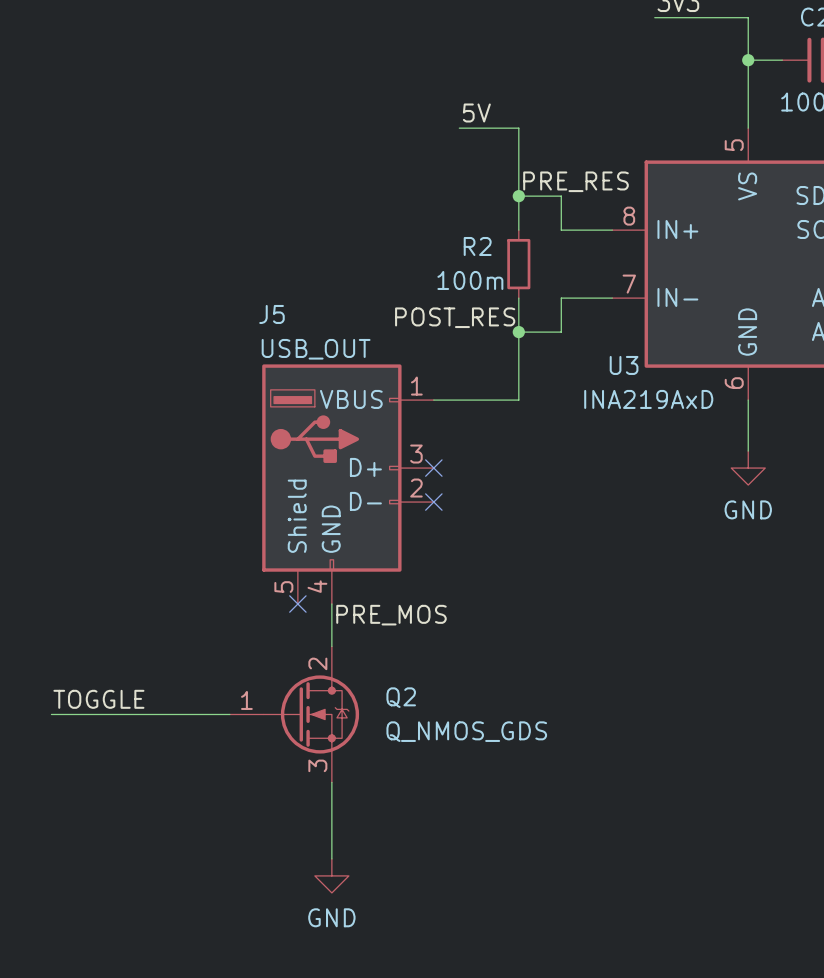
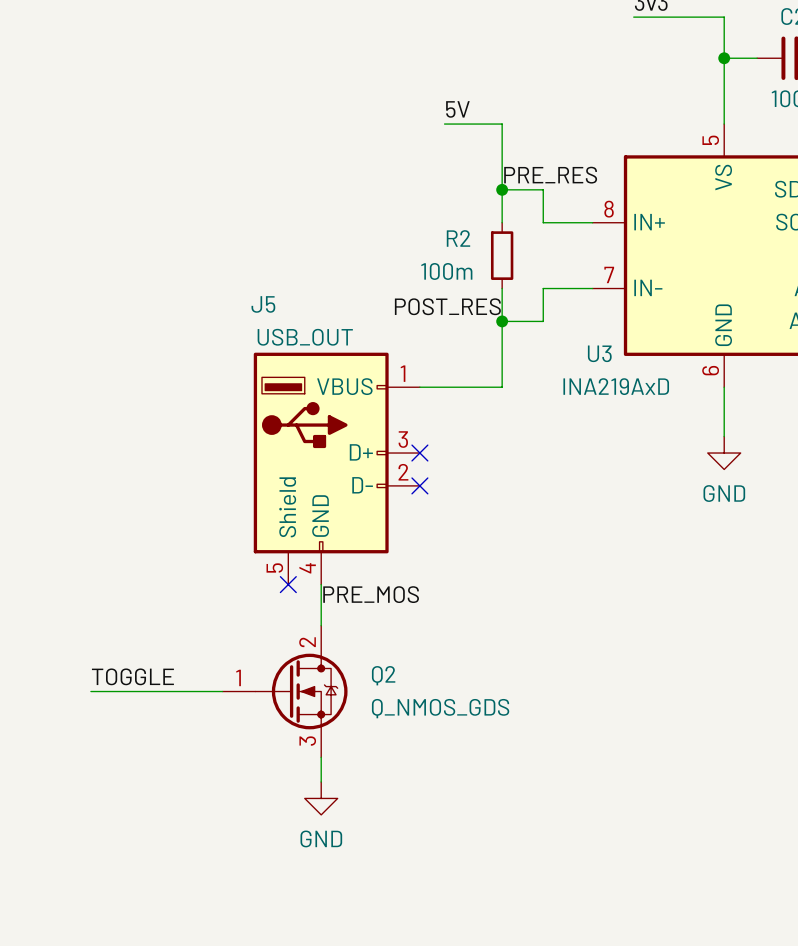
label position: TOGGLE (98, 699) -> TOGGLE (132, 676)
wire: (51, 714) (93, 714) -> none
wire: (331, 807) (331, 858) -> none
power symbol position: GND (331, 875) -> GND (321, 798)

